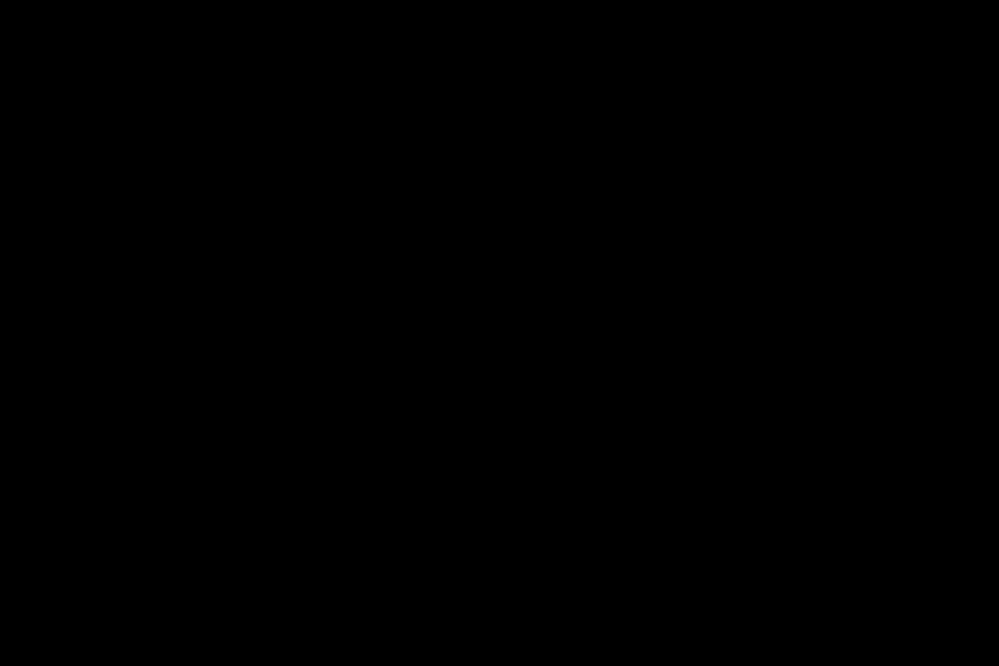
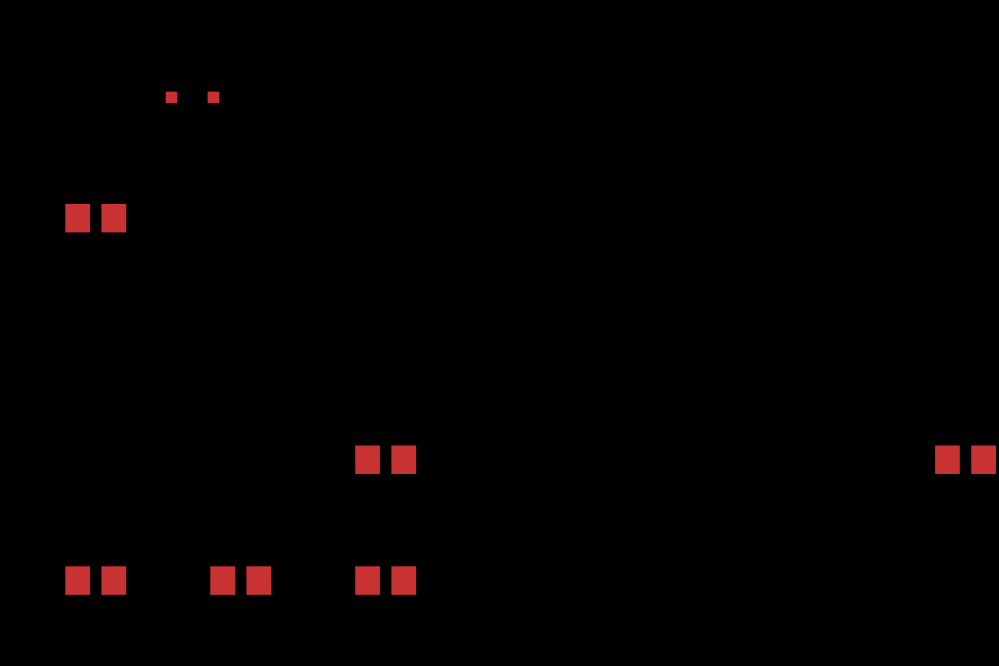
part: none -> (192, 97)
part: none -> (95, 218)
part: none -> (385, 459)
part: none -> (965, 459)
part: none -> (95, 580)
part: none -> (240, 580)
part: none -> (385, 580)

